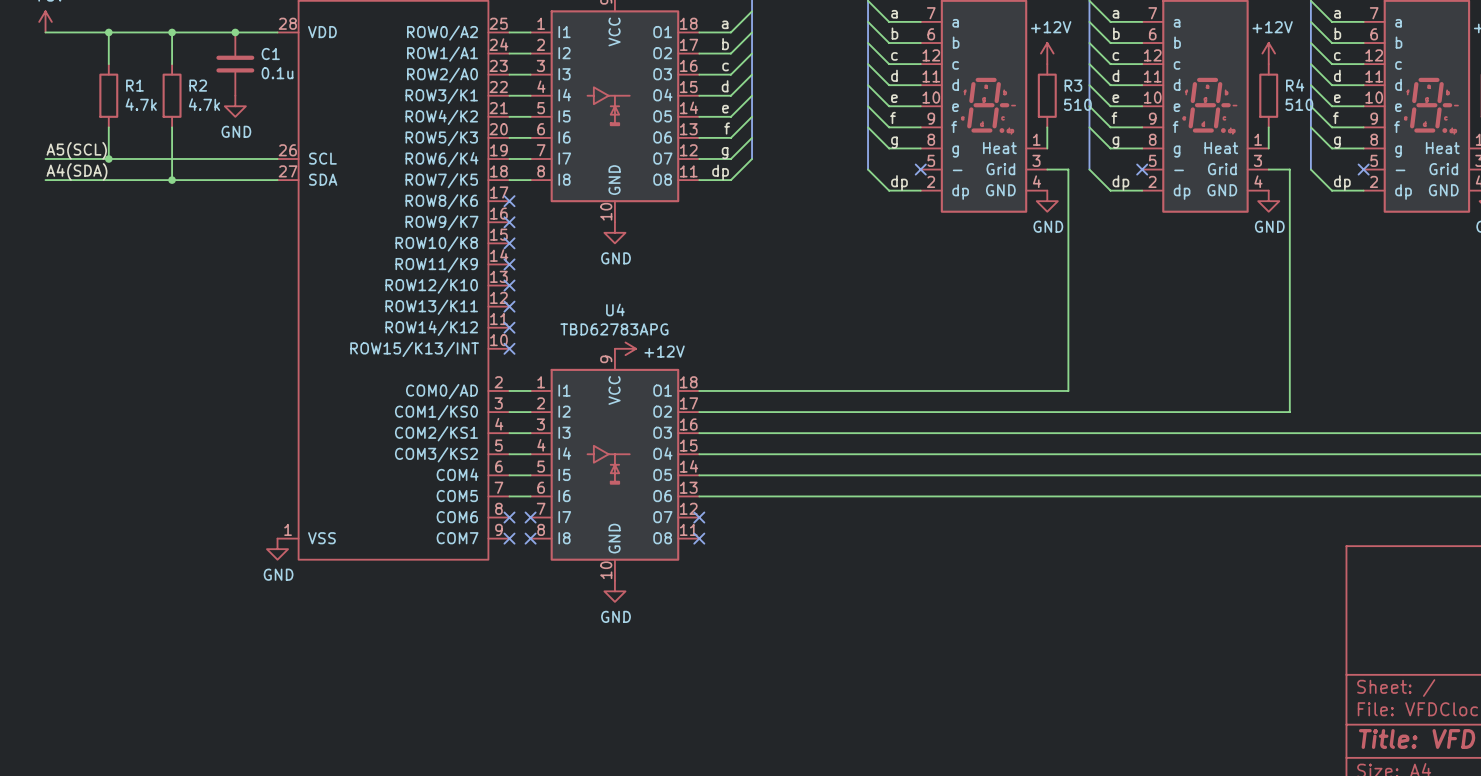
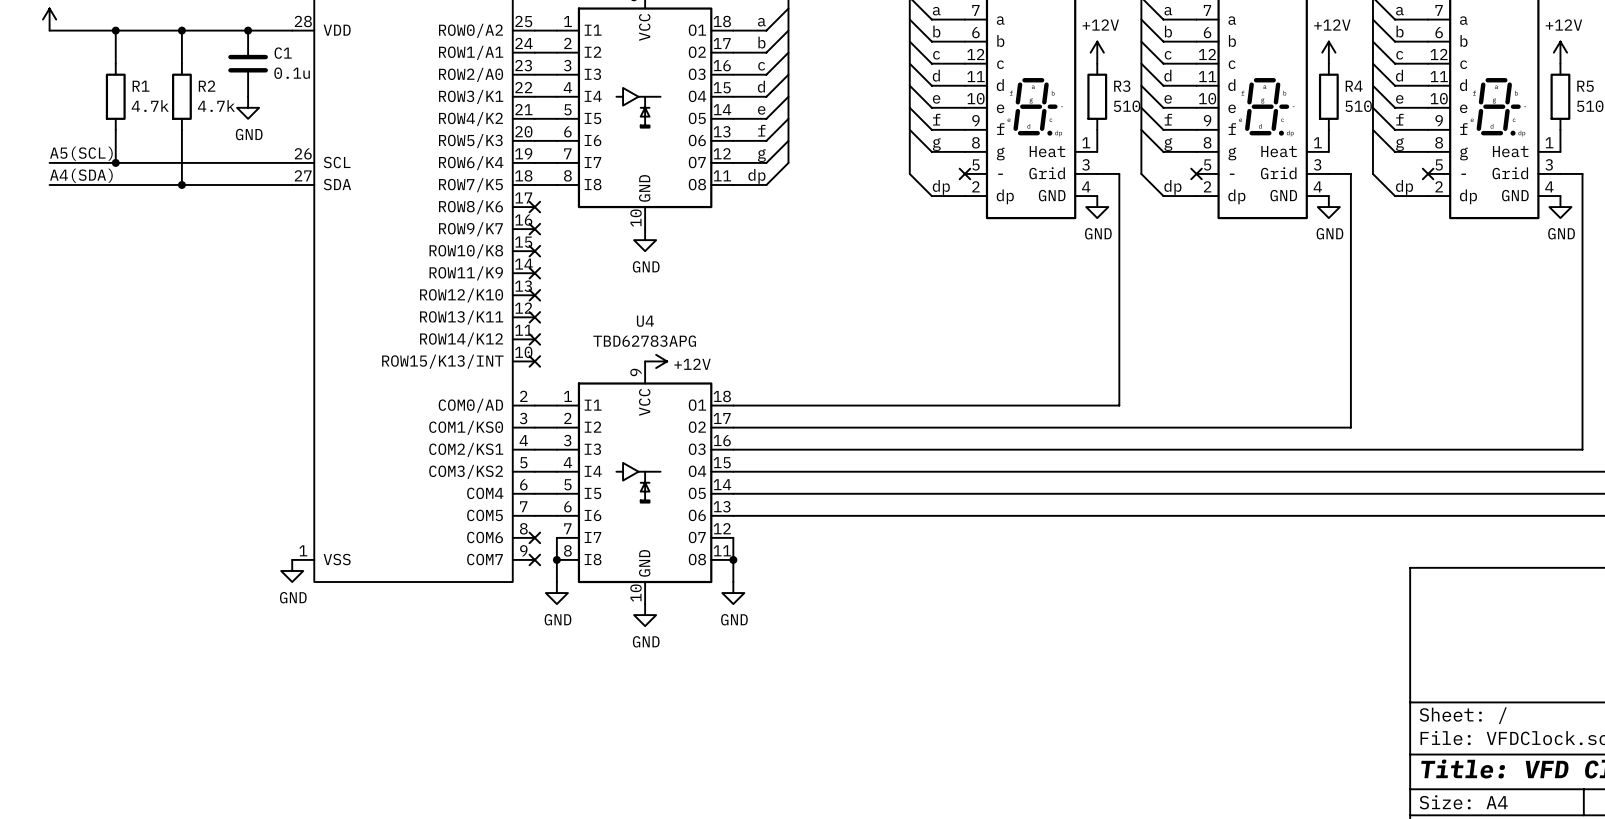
wire: none -> (556, 537) (556, 582)
no-connect mark: (530, 517) -> none
wire: none -> (733, 537) (733, 582)
no-connect mark: (699, 517) -> none
no-connect mark: (530, 538) -> none
junction: none -> (556, 559)
no-connect mark: (699, 538) -> none
junction: none -> (733, 559)
power symbol: none -> GND (556, 593)
power symbol: none -> GND (733, 593)

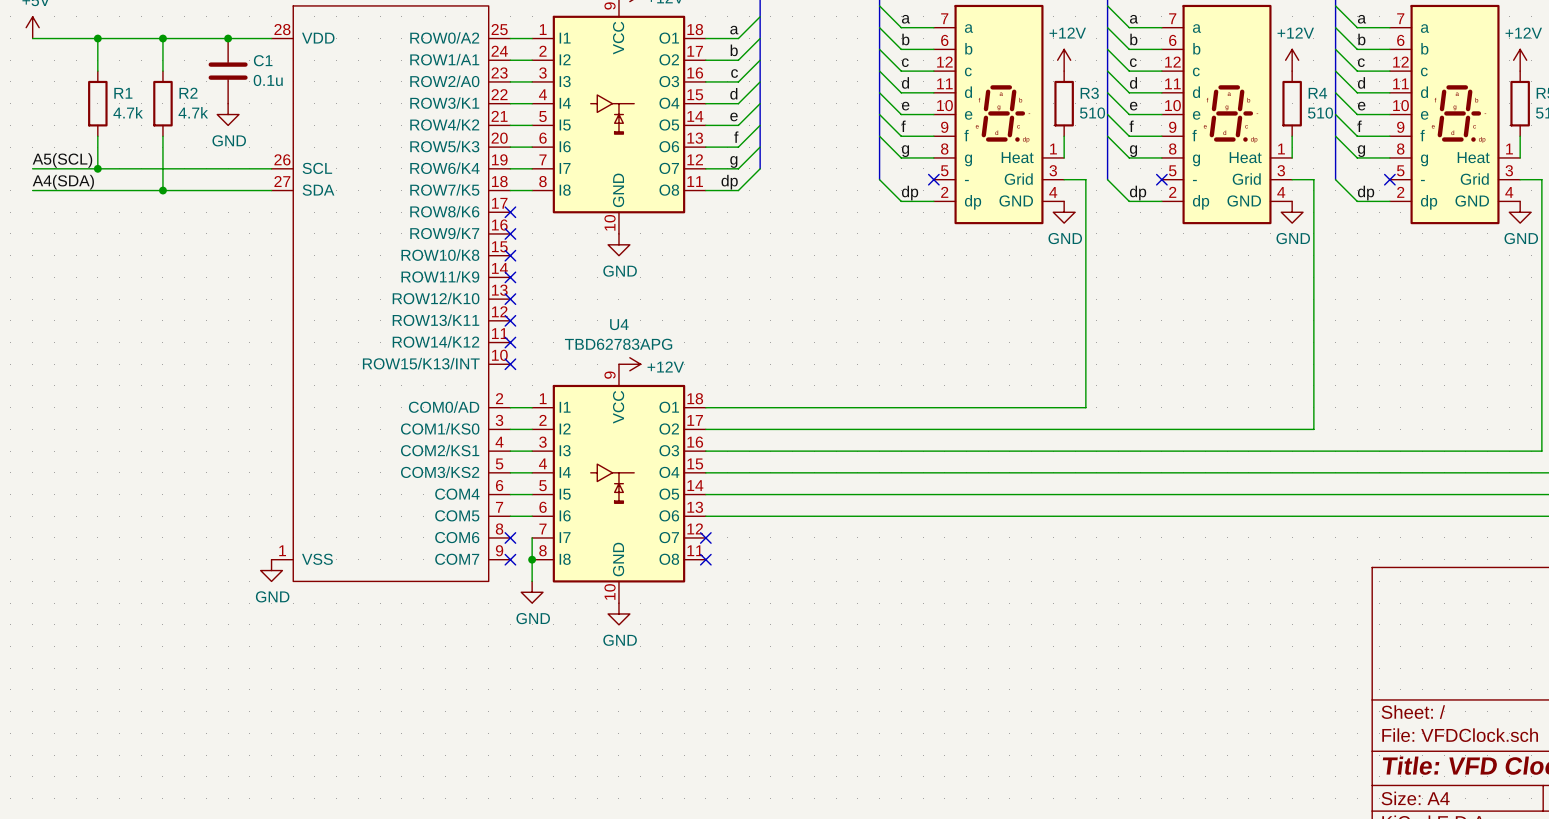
wire: (733, 537) (733, 582) -> none
no-connect mark: none -> (705, 537)
junction: (733, 559) -> none
no-connect mark: none -> (705, 559)
power symbol: GND (733, 593) -> none

